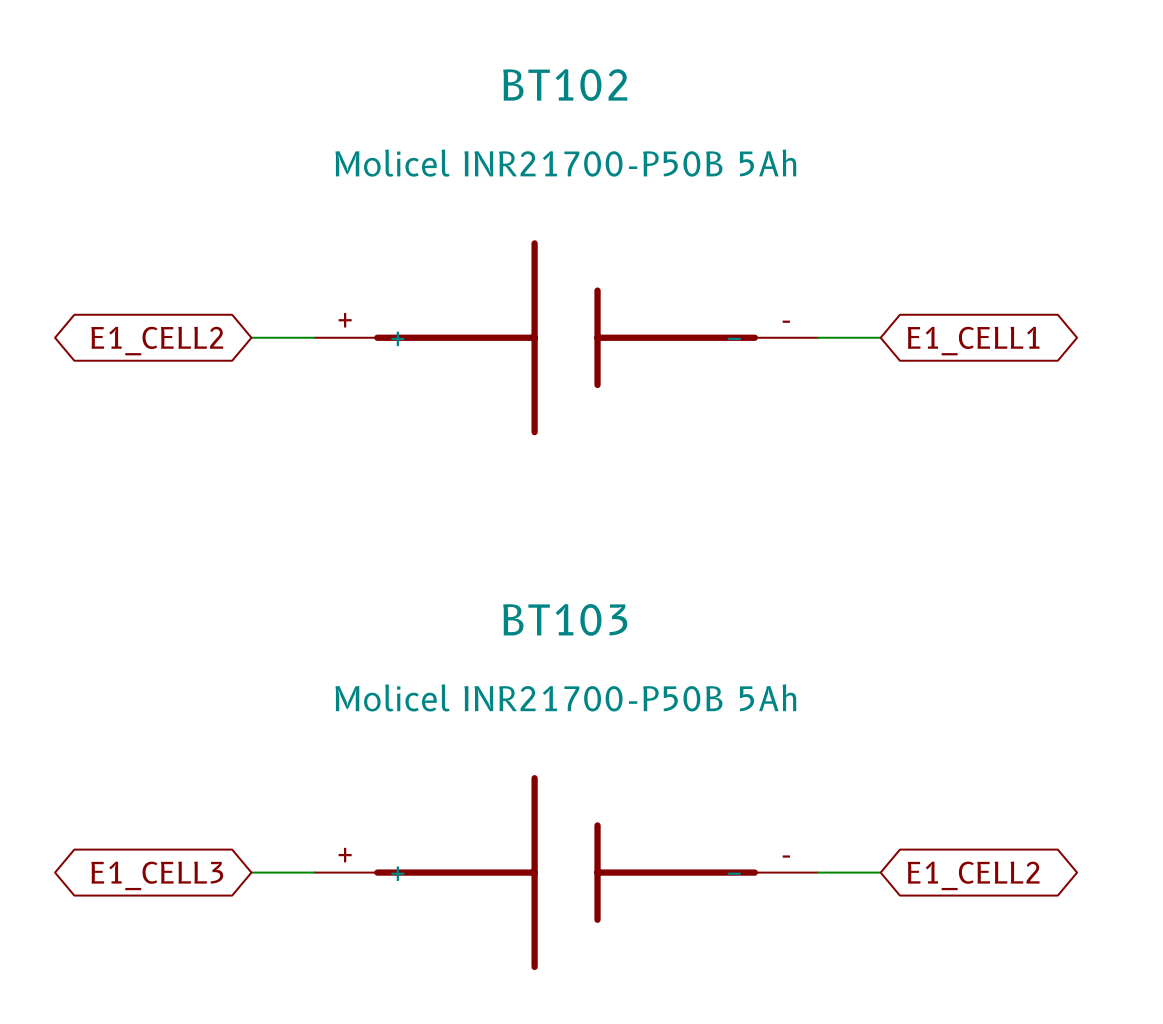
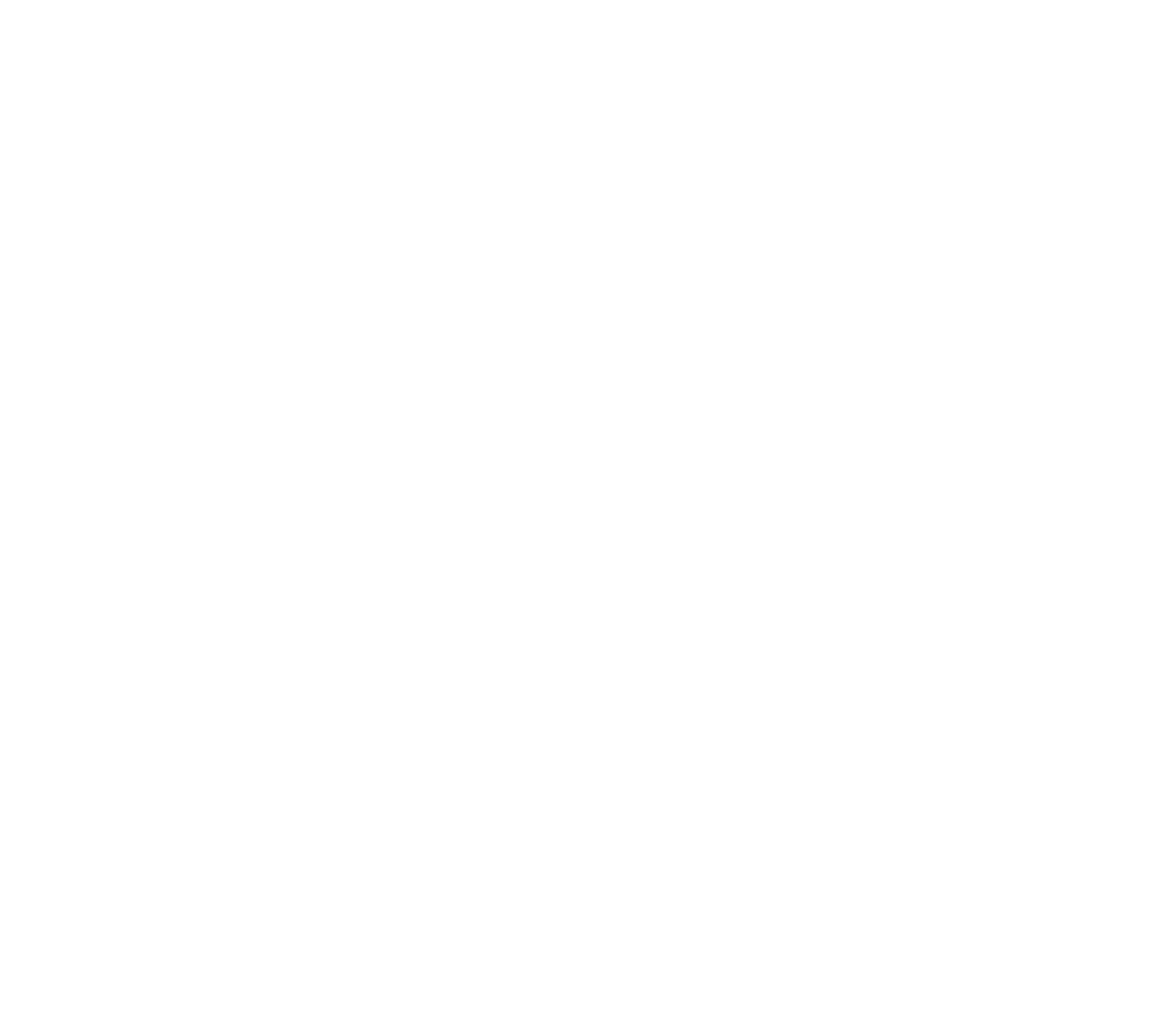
wire: (251, 337) (314, 337) -> none
BT102: Molicel INR21700-P50B 5Ah (566, 337) -> none
wire: (817, 337) (880, 337) -> none
global label: E1_CELL2 (157, 341) -> none
global label: E1_CELL1 (973, 341) -> none
wire: (251, 872) (314, 872) -> none
BT103: Molicel INR21700-P50B 5Ah (566, 872) -> none
wire: (817, 872) (880, 872) -> none
global label: E1_CELL3 (157, 875) -> none
global label: E1_CELL2 (973, 875) -> none

